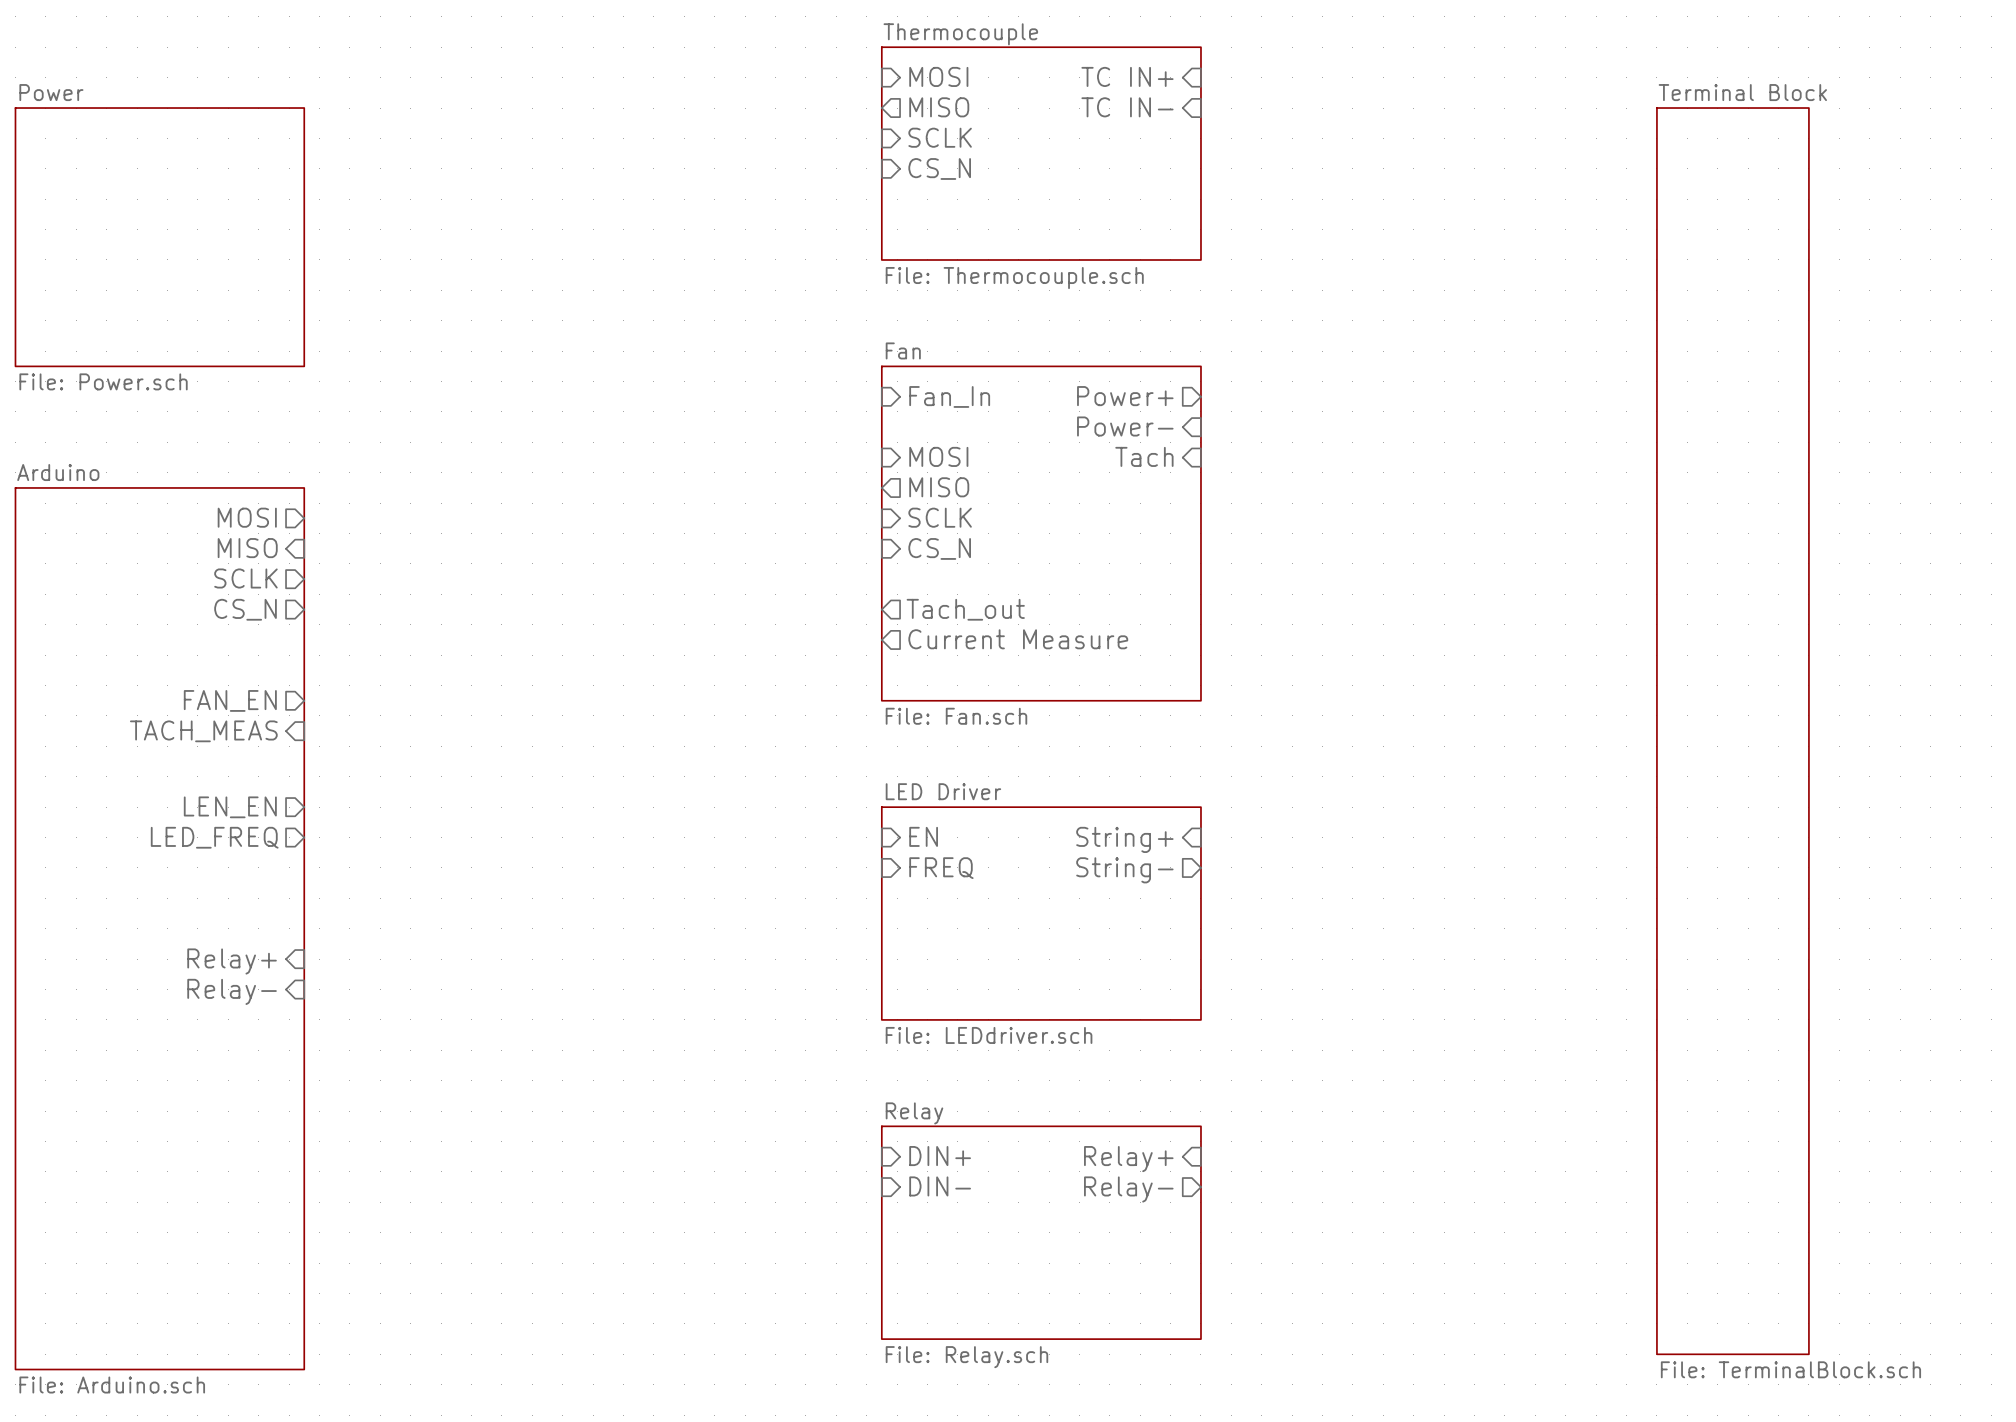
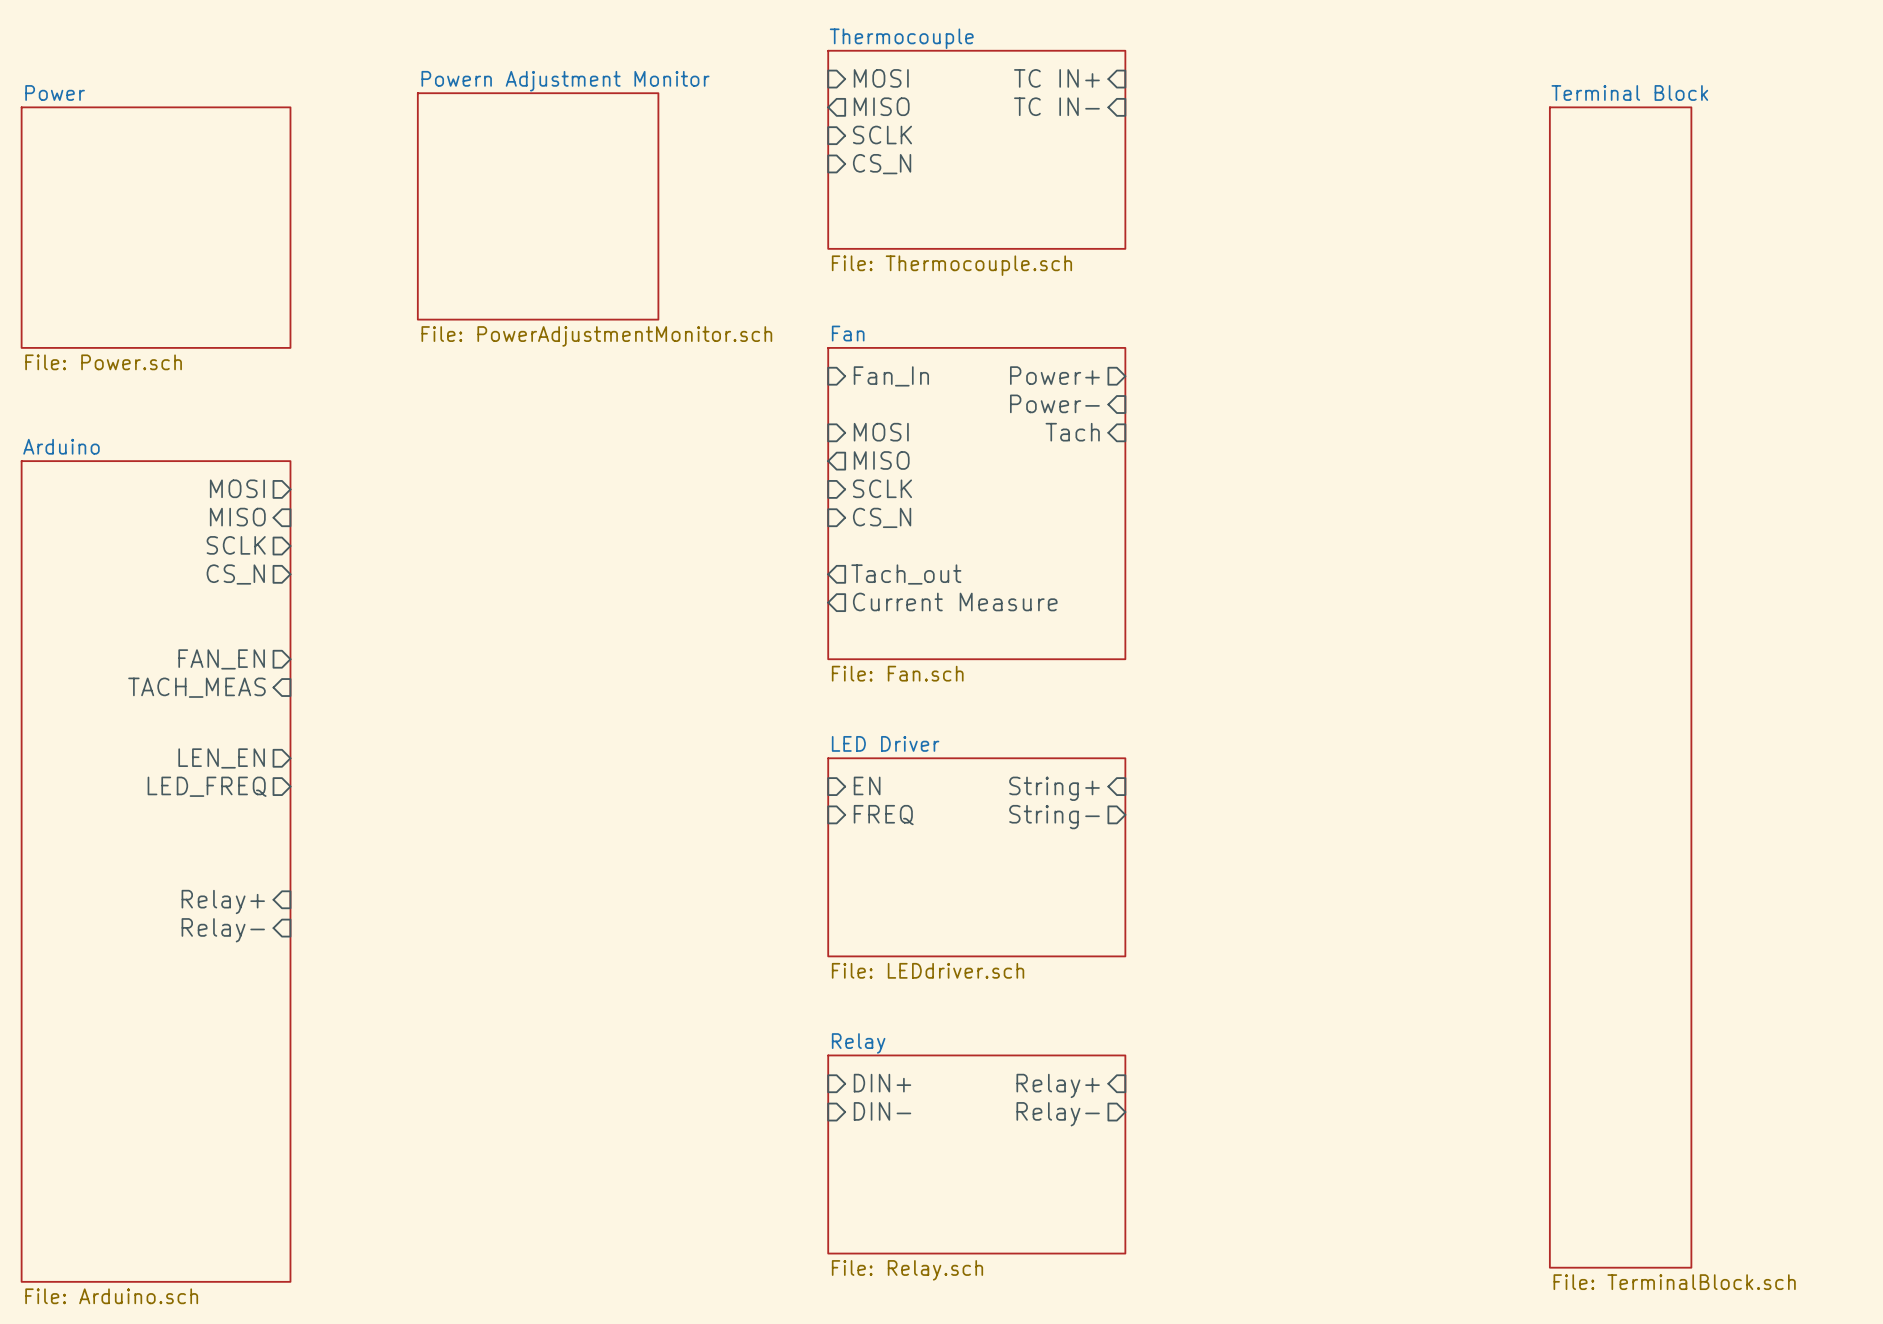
sheet Powern Adjustment Monitor: none -> File: PowerAdjustmentMonitor.sch (538, 206)

